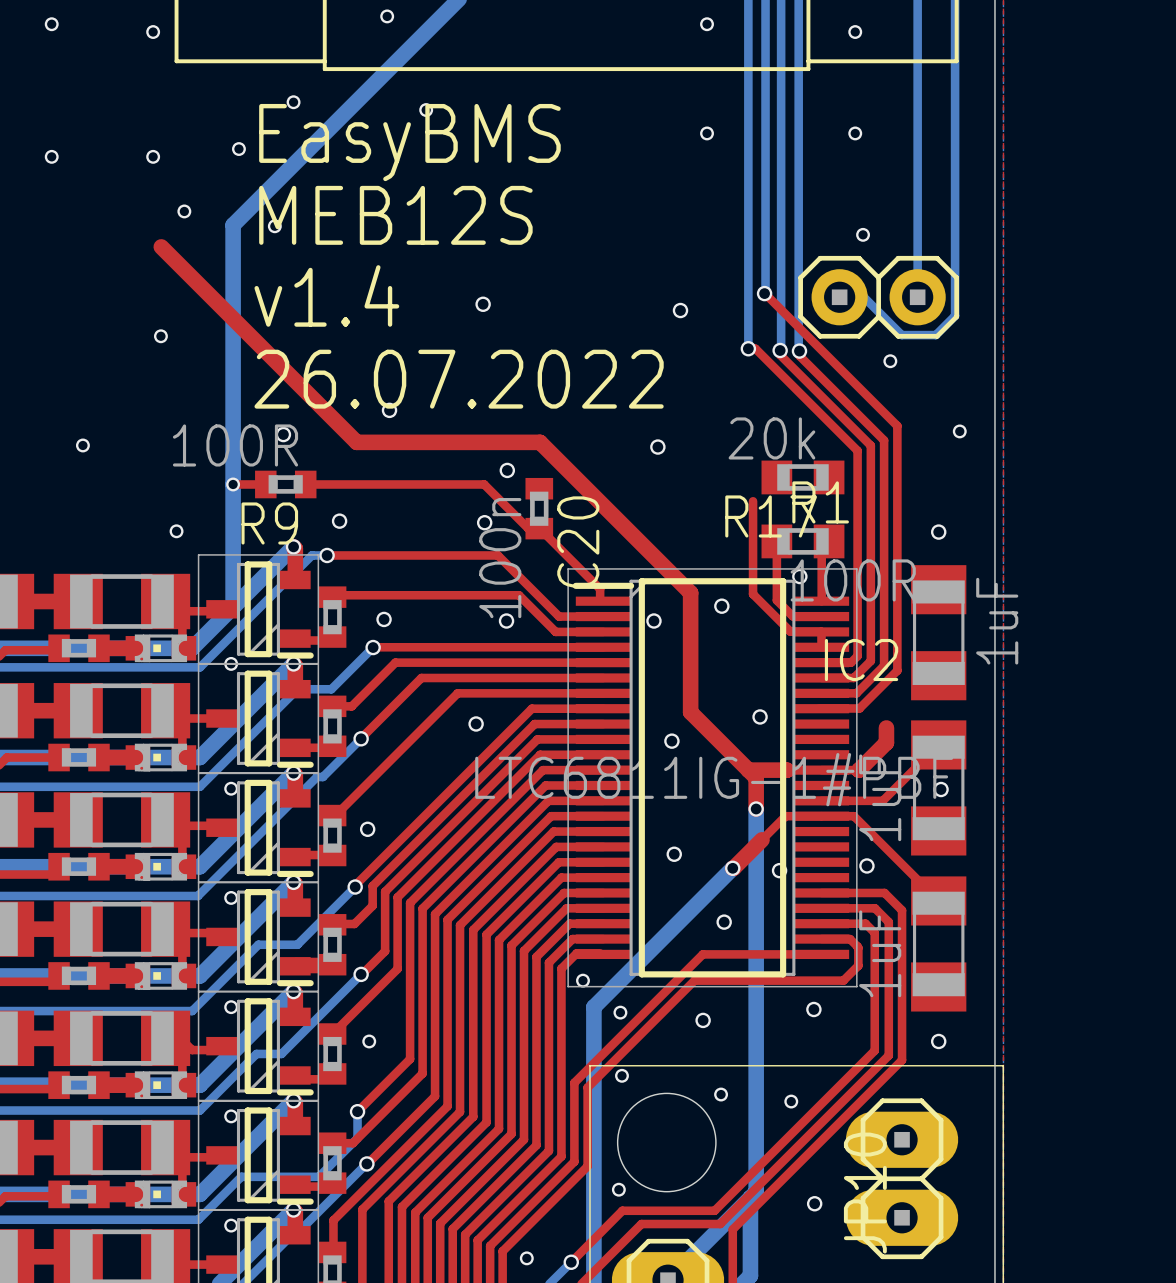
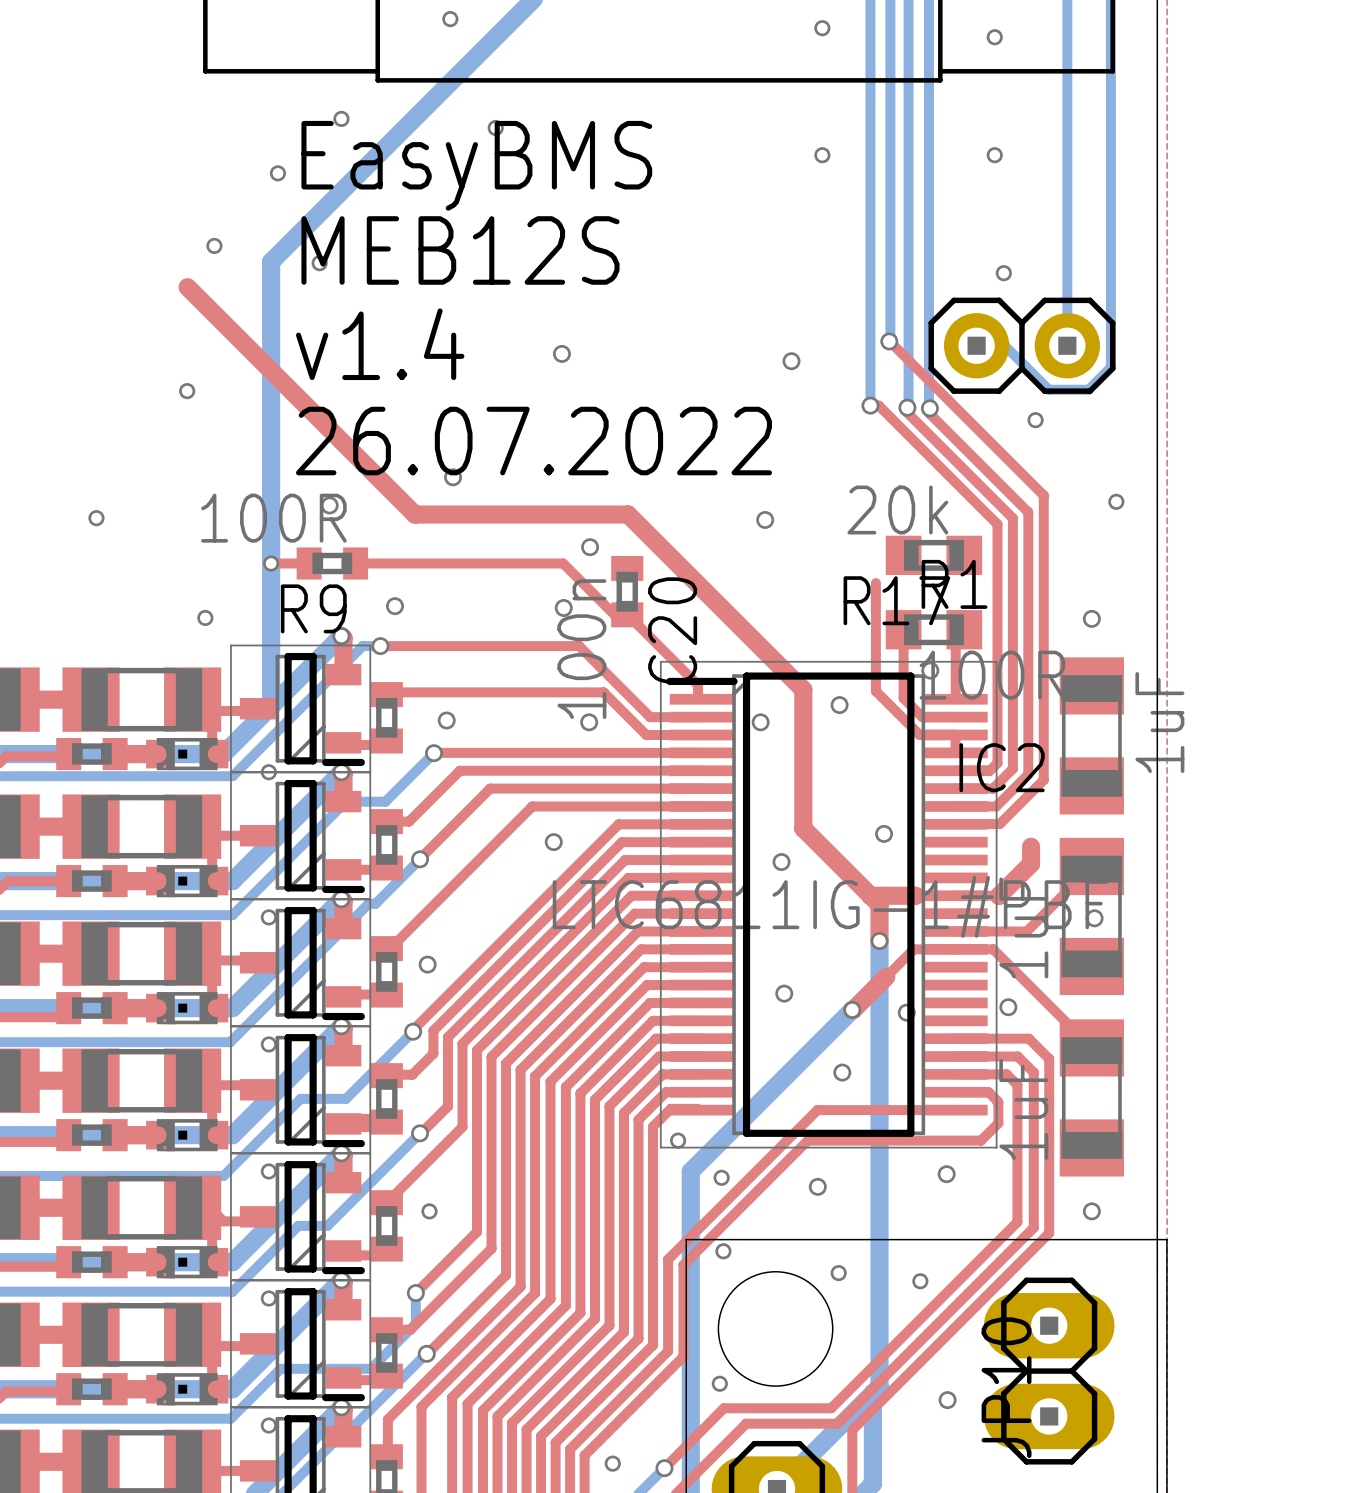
via: (51, 24) -> none
via: (153, 32) -> none
via: (51, 156) -> none
via: (153, 156) -> none

